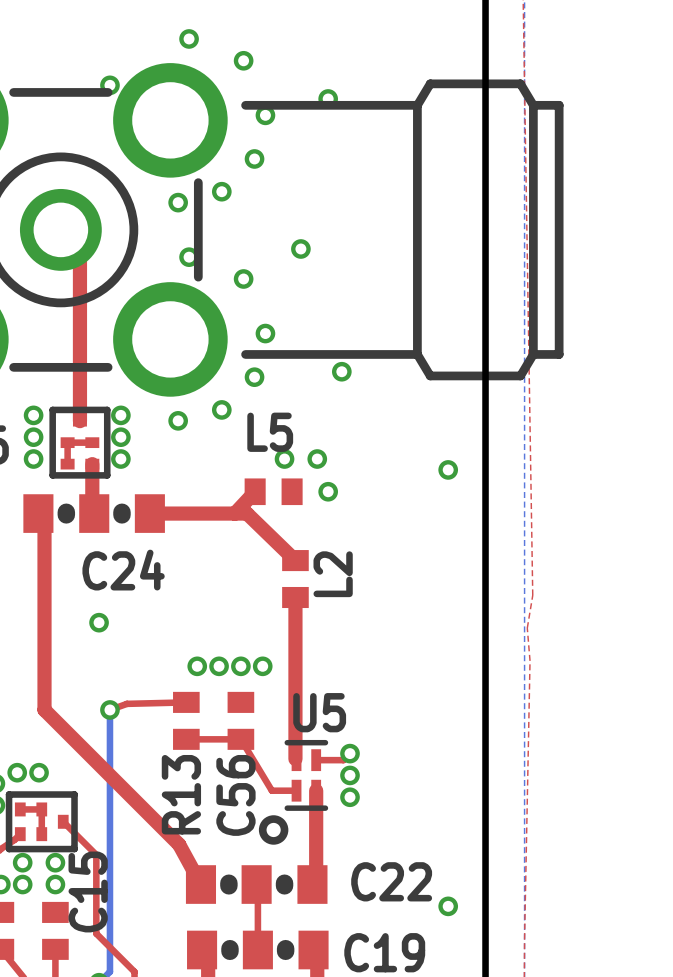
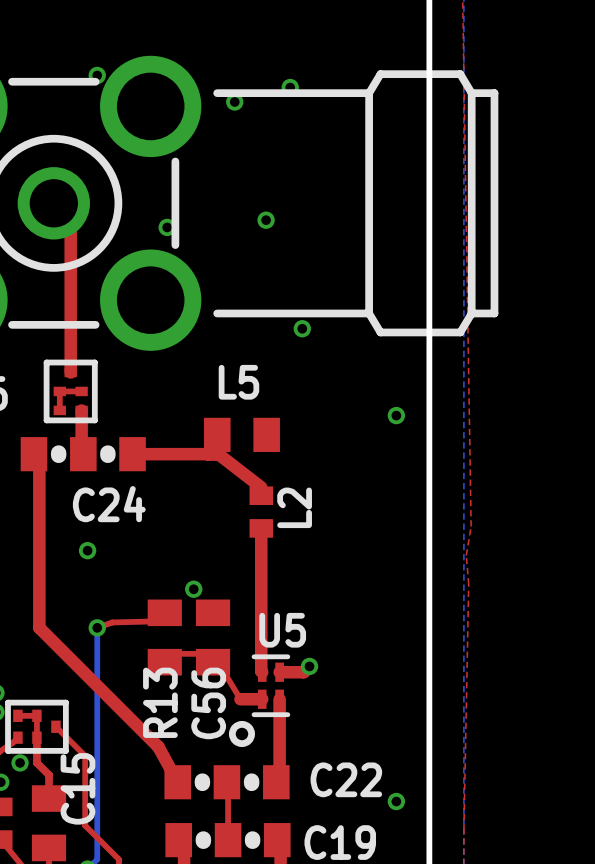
via: (189, 38) -> none
via: (243, 60) -> none
via: (254, 158) -> none
via: (221, 191) -> none
via: (178, 202) -> none
via: (243, 278) -> none
via: (265, 333) -> none
via: (254, 377) -> none
via: (221, 409) -> none
via: (33, 415) -> none
via: (120, 415) -> none
via: (178, 420) -> none
via: (33, 437) -> none
via: (120, 437) -> none
via: (33, 459) -> none
via: (120, 459) -> none
via: (284, 459) -> none
via: (317, 459) -> none
L5 footprint: [244, 478, 303, 506] -> [203, 417, 280, 452]
top track: (255, 491) (234, 513) (246, 513) (295, 560) -> none
via: (328, 491) -> none
top track: none -> (218, 454) (261, 487)
via: (197, 666) -> none
via: (240, 666) -> none
via: (262, 666) -> none
R13 footprint: [173, 691, 200, 750] -> [147, 599, 182, 676]
C56 footprint: [227, 691, 255, 750] -> [195, 599, 231, 676]
top track width: thin (350, 753) (343, 760) (316, 760) -> thick (309, 666) (303, 672) (279, 672)
via: (17, 772) -> none
via: (39, 772) -> none
via: (350, 775) -> none
top track width: thin (271, 790) (296, 790) -> thick (240, 699) (262, 699)
via: (350, 797) -> none
top track: none -> (36, 737) (36, 762) (49, 774) (49, 798)
via: (55, 862) -> none
via: (22, 884) -> none
via: (55, 884) -> none
C15 footprint: [42, 901, 69, 960] -> [31, 785, 67, 862]

